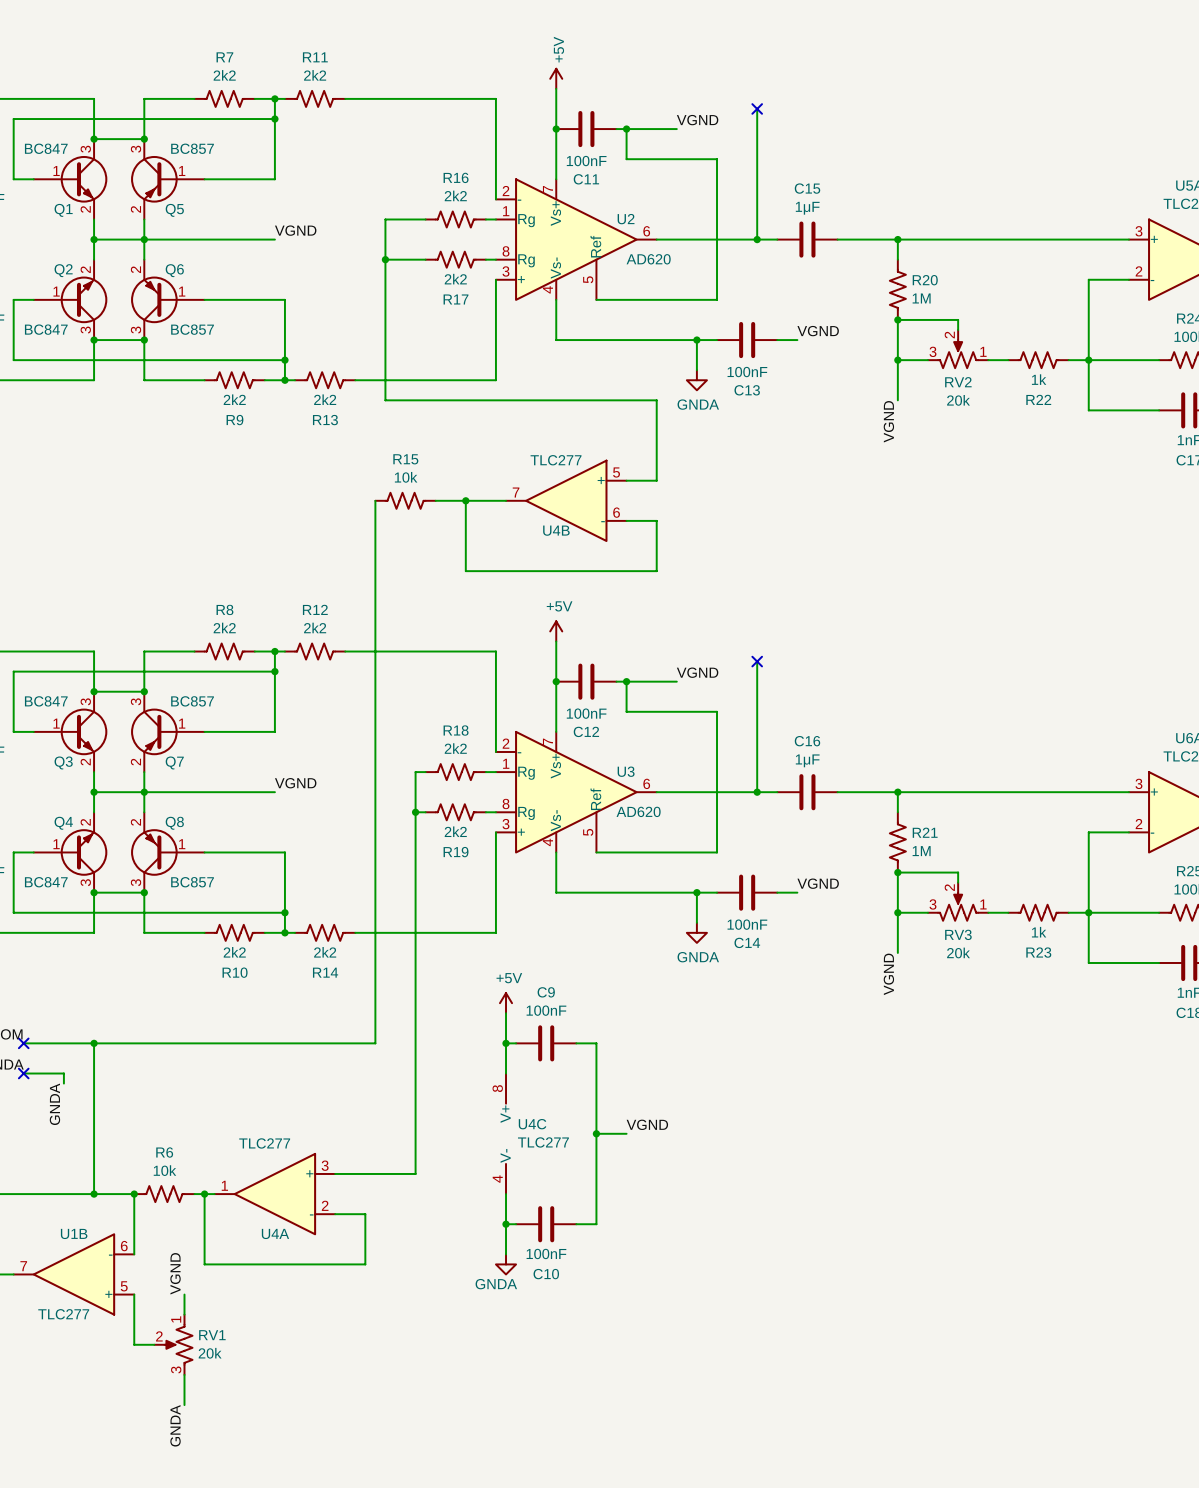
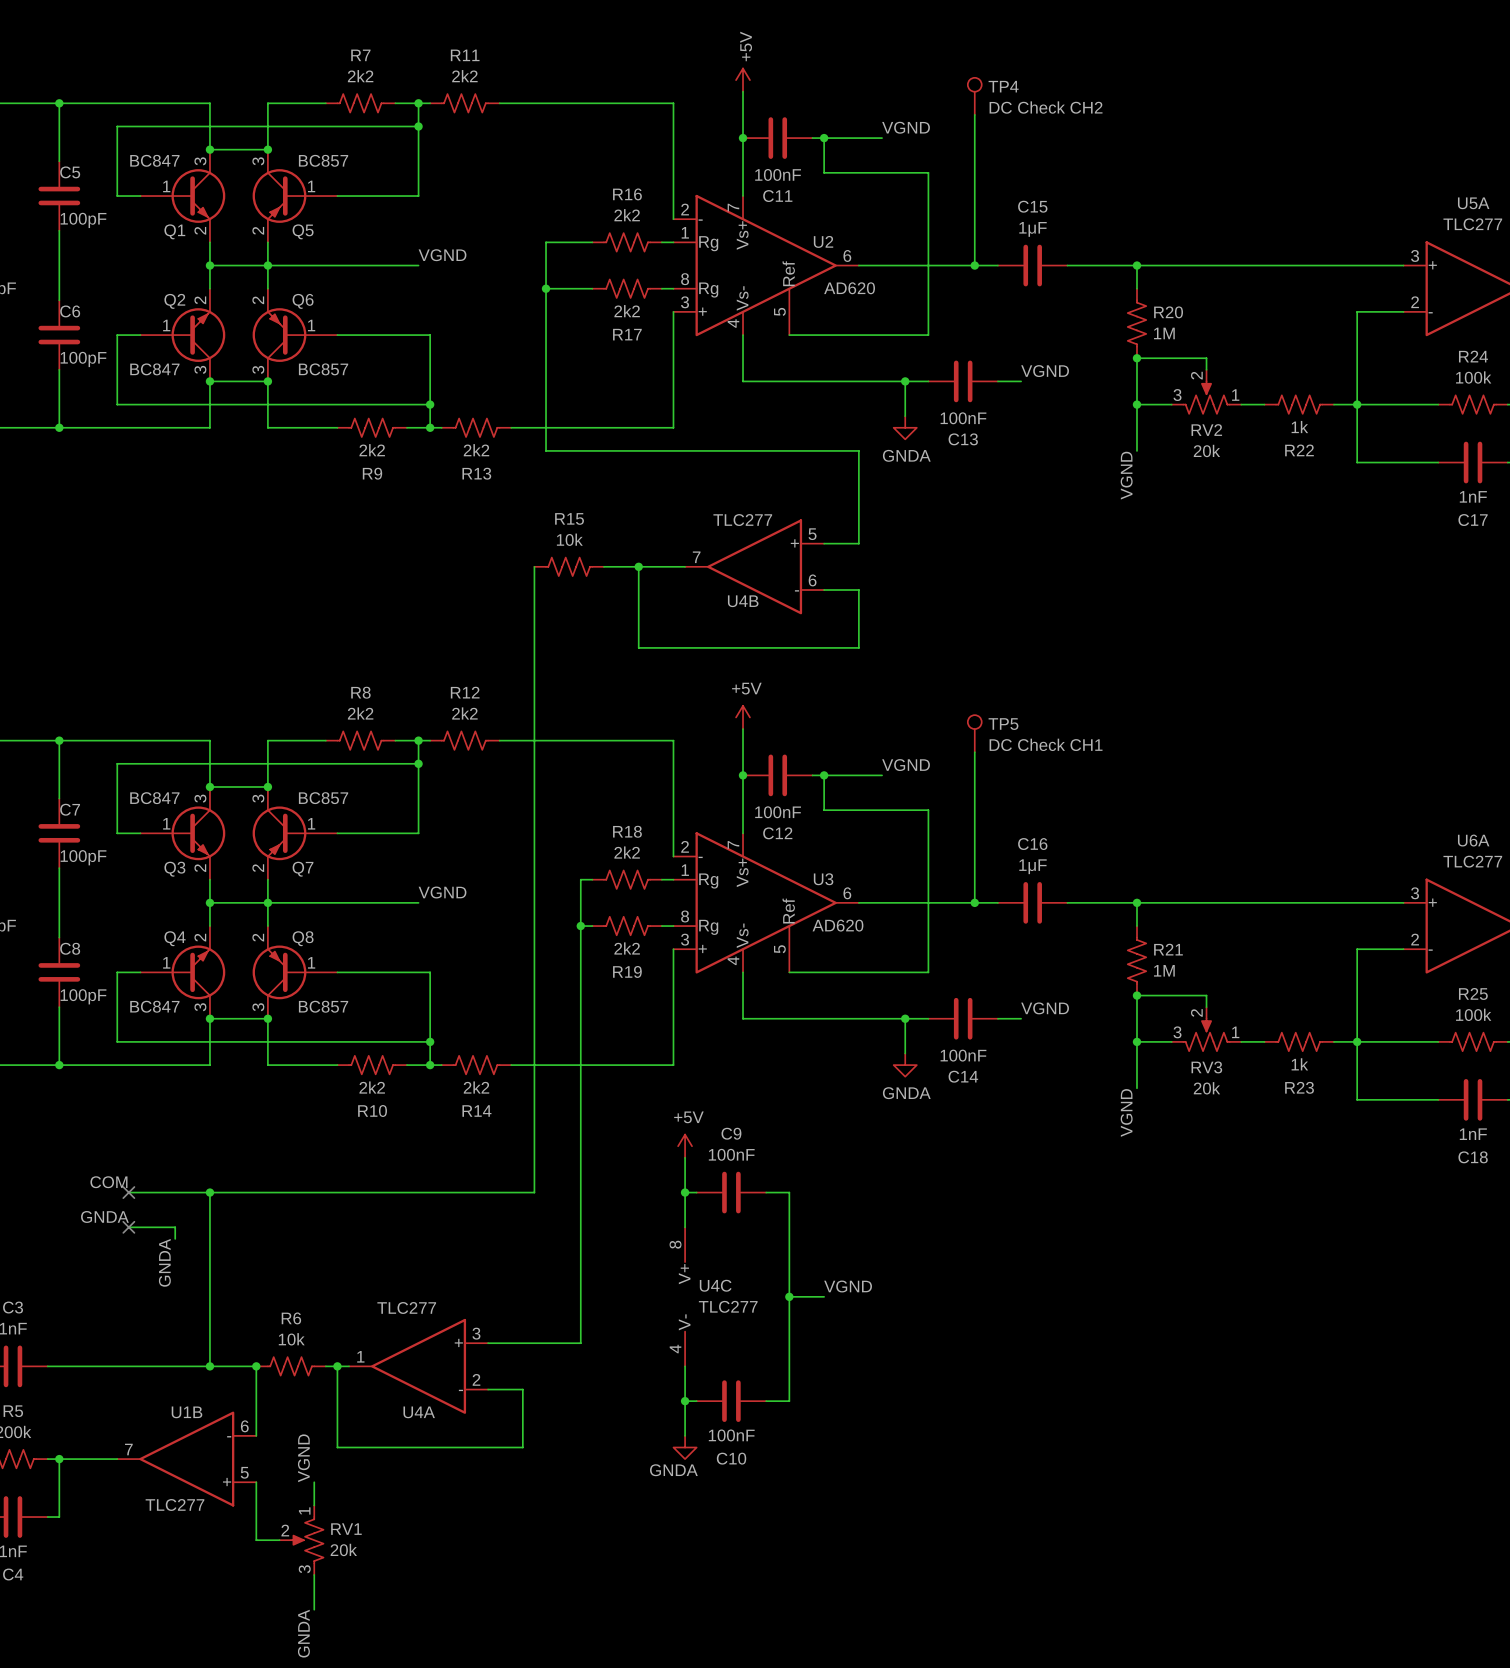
TP4: none -> DC Check CH2 (974, 96)
no-connect mark: (757, 108) -> none
TP5: none -> DC Check CH1 (974, 733)
no-connect mark: (757, 661) -> none

